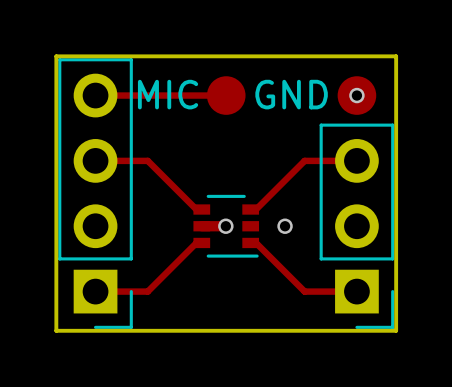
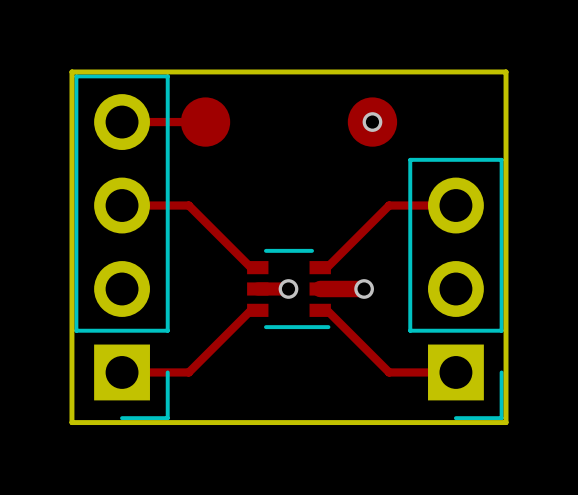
track: (160, 95) (232, 95) -> none
part: none -> (205, 122)
part: MIC (226, 95) -> none
part: none -> (372, 122)
part: GND (356, 95) -> none
via position: (356, 95) -> (372, 122)
track: none -> (320, 288) (364, 288)

